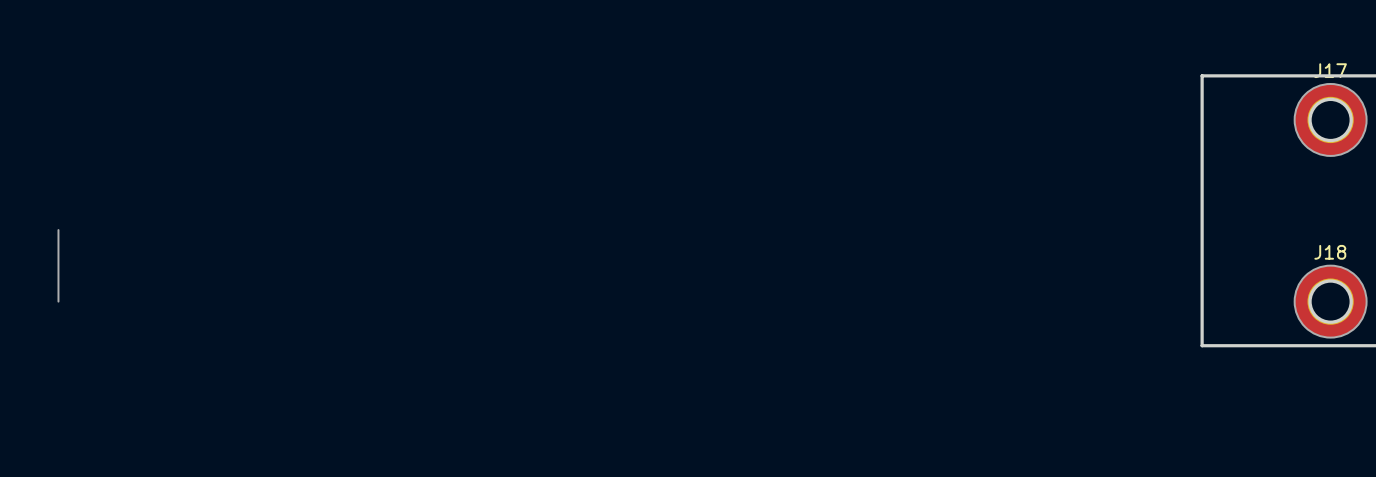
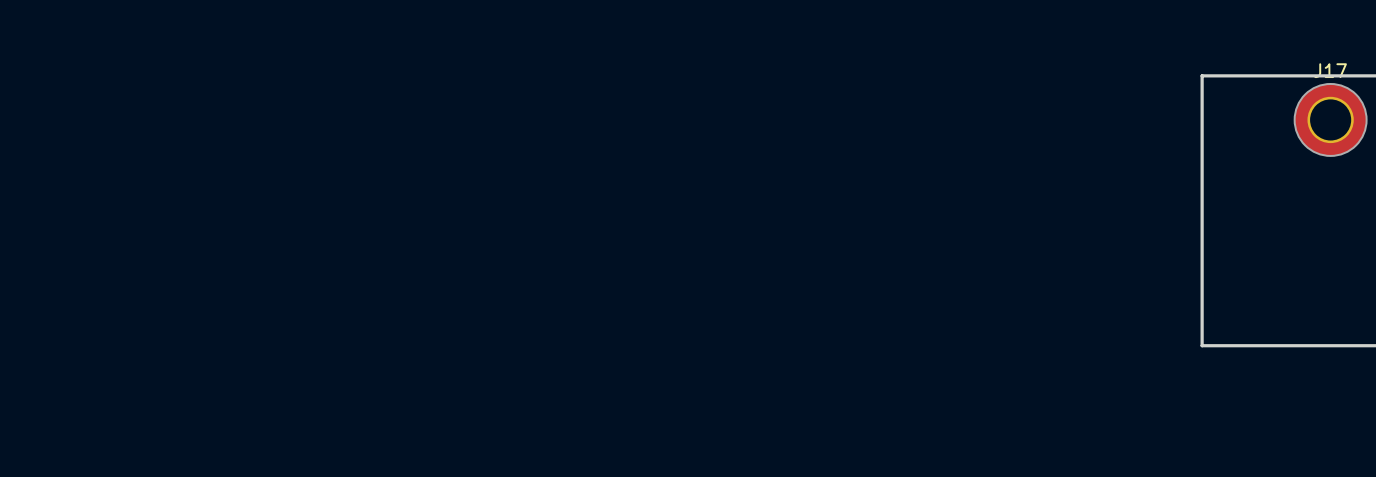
round board edge: [1308, 97, 1353, 143] -> none
line: (58, 230) (58, 301) -> none
round board edge: [1308, 279, 1353, 324] -> none
J18: (1330, 301) -> none

